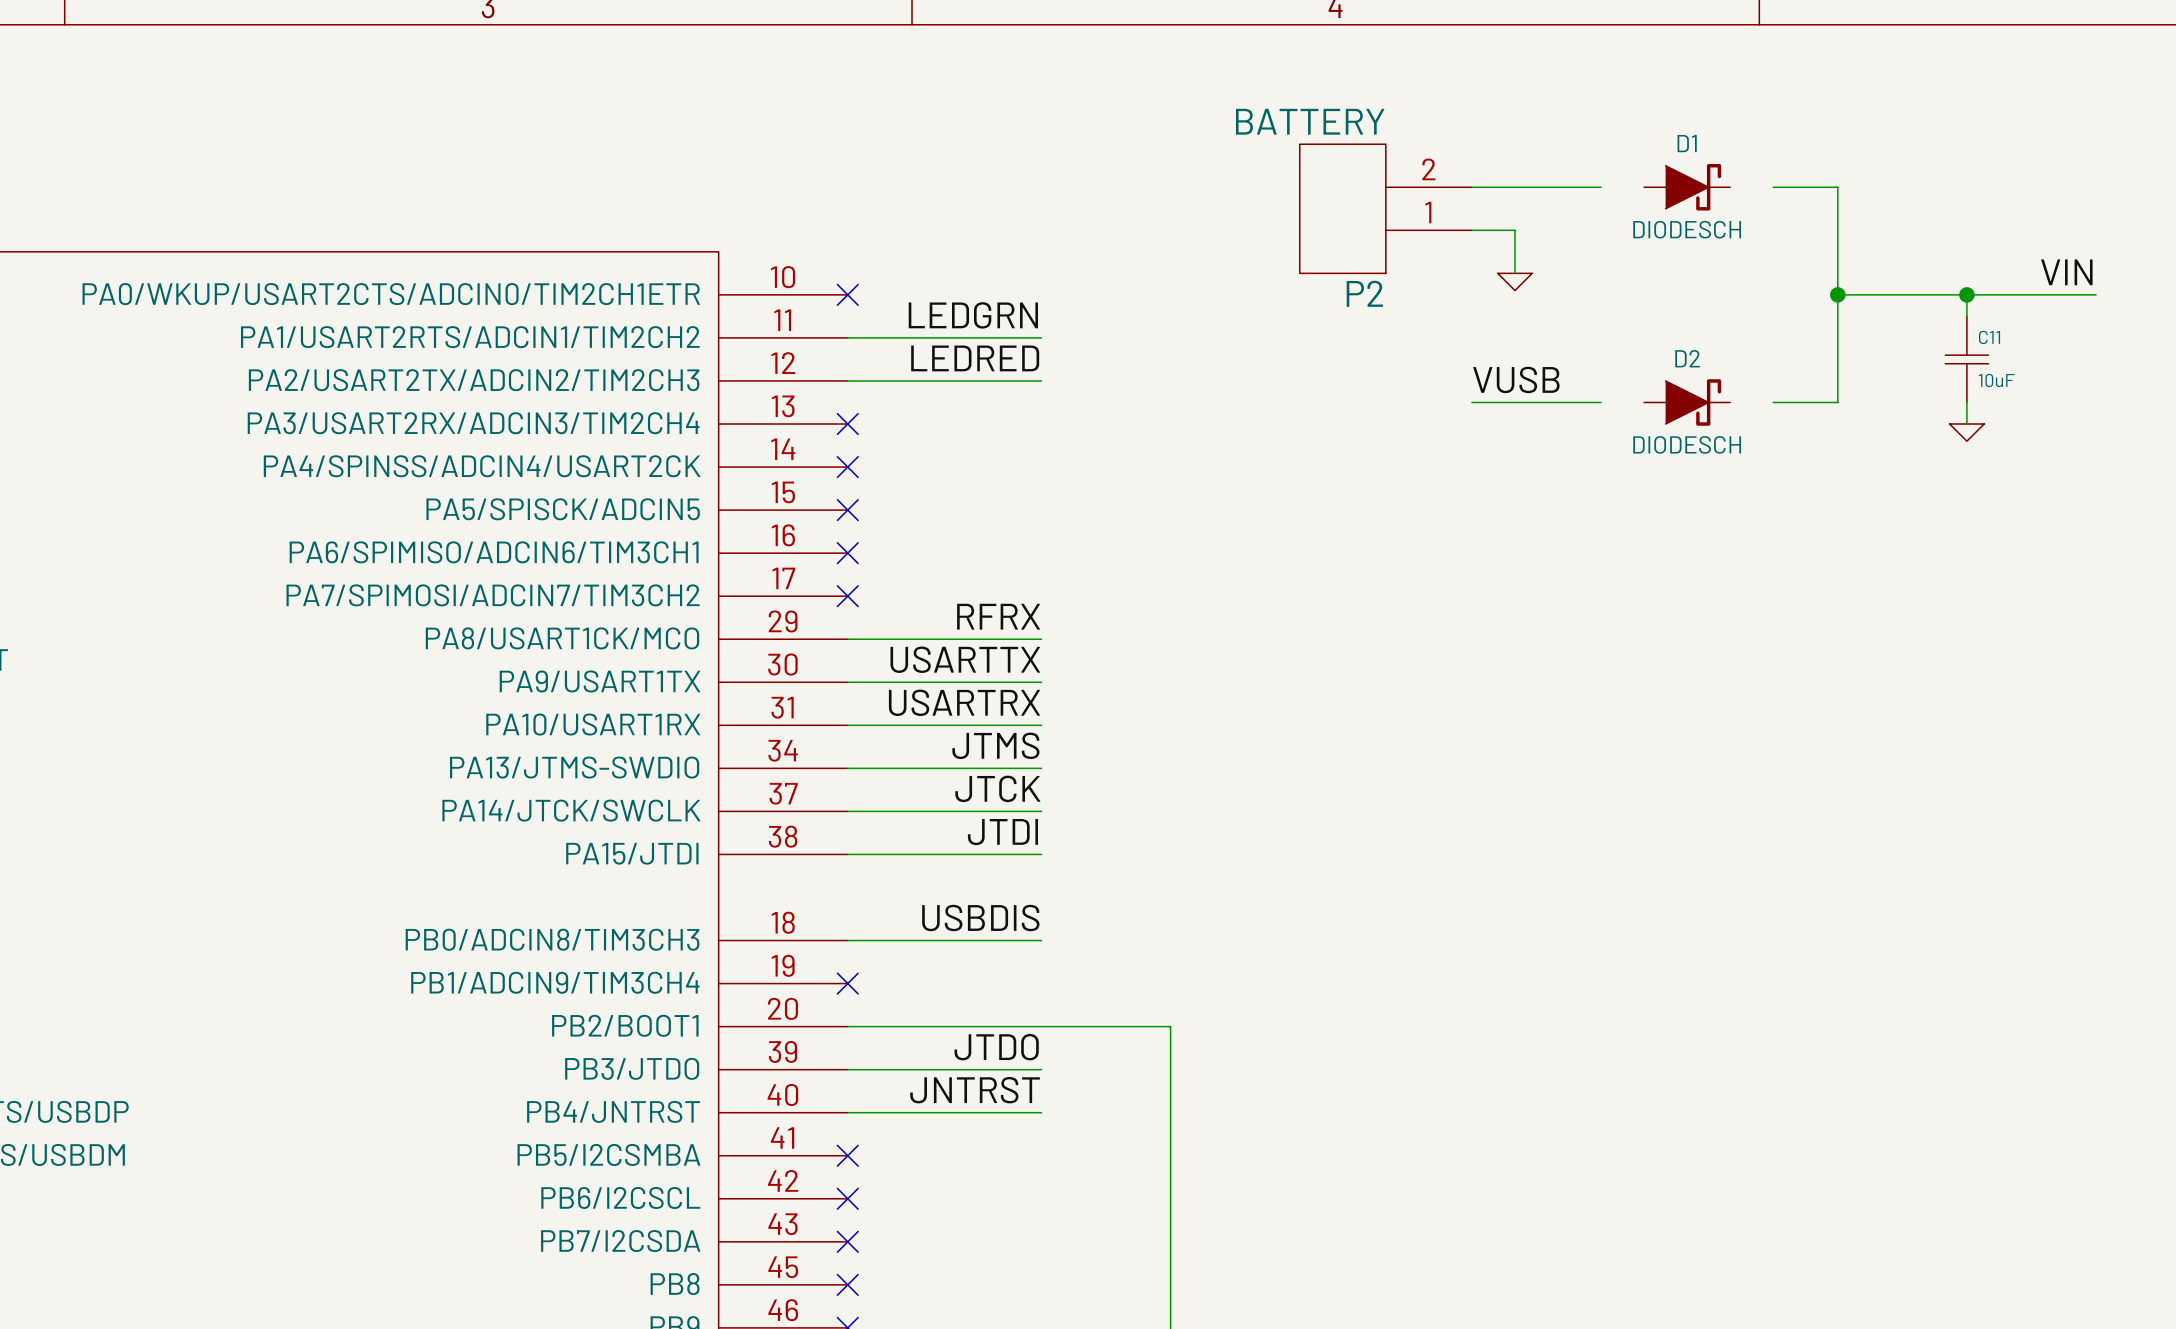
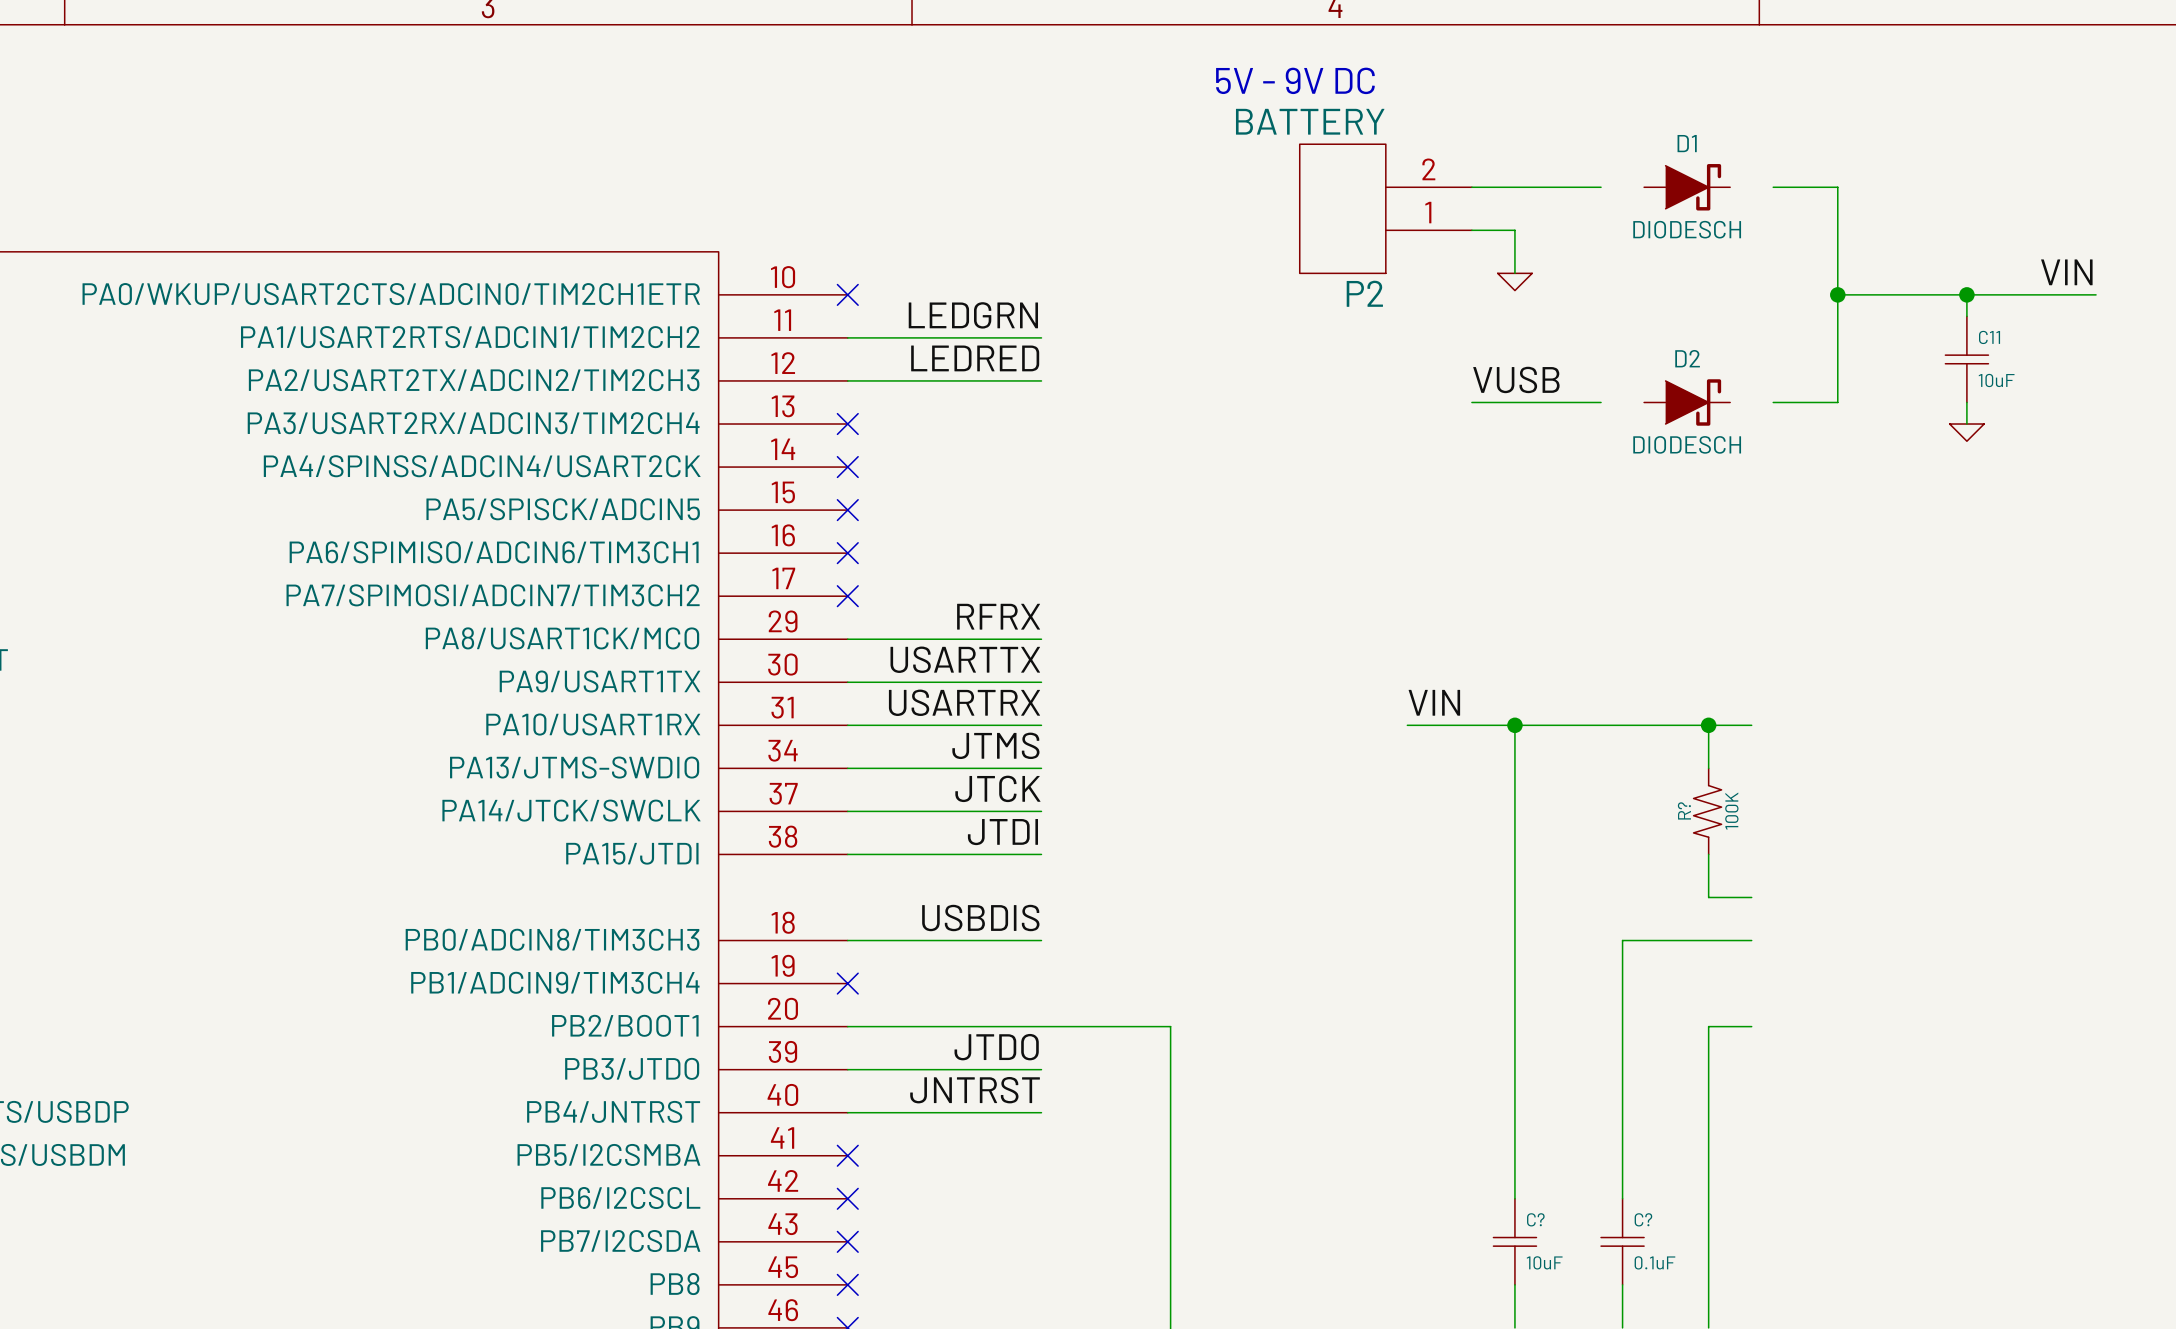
text: none -> 5V - 9V DC (1295, 80)
label: none -> VIN (1434, 702)
wire: none -> (1407, 725) (1751, 725)
wire: none -> (1514, 725) (1514, 1198)
junction: none -> (1514, 725)
wire: none -> (1708, 725) (1708, 768)
junction: none -> (1708, 725)
R?: none -> 100K (1707, 811)
wire: none -> (1708, 854) (1708, 897) (1751, 897)
wire: none -> (1751, 940) (1622, 940) (1622, 1198)
wire: none -> (1751, 1026) (1708, 1026) (1708, 1327)
C?: none -> 10uF (1514, 1241)
C?: none -> 0.1uF (1622, 1241)
wire: none -> (1514, 1284) (1514, 1327)
wire: none -> (1622, 1284) (1622, 1327)

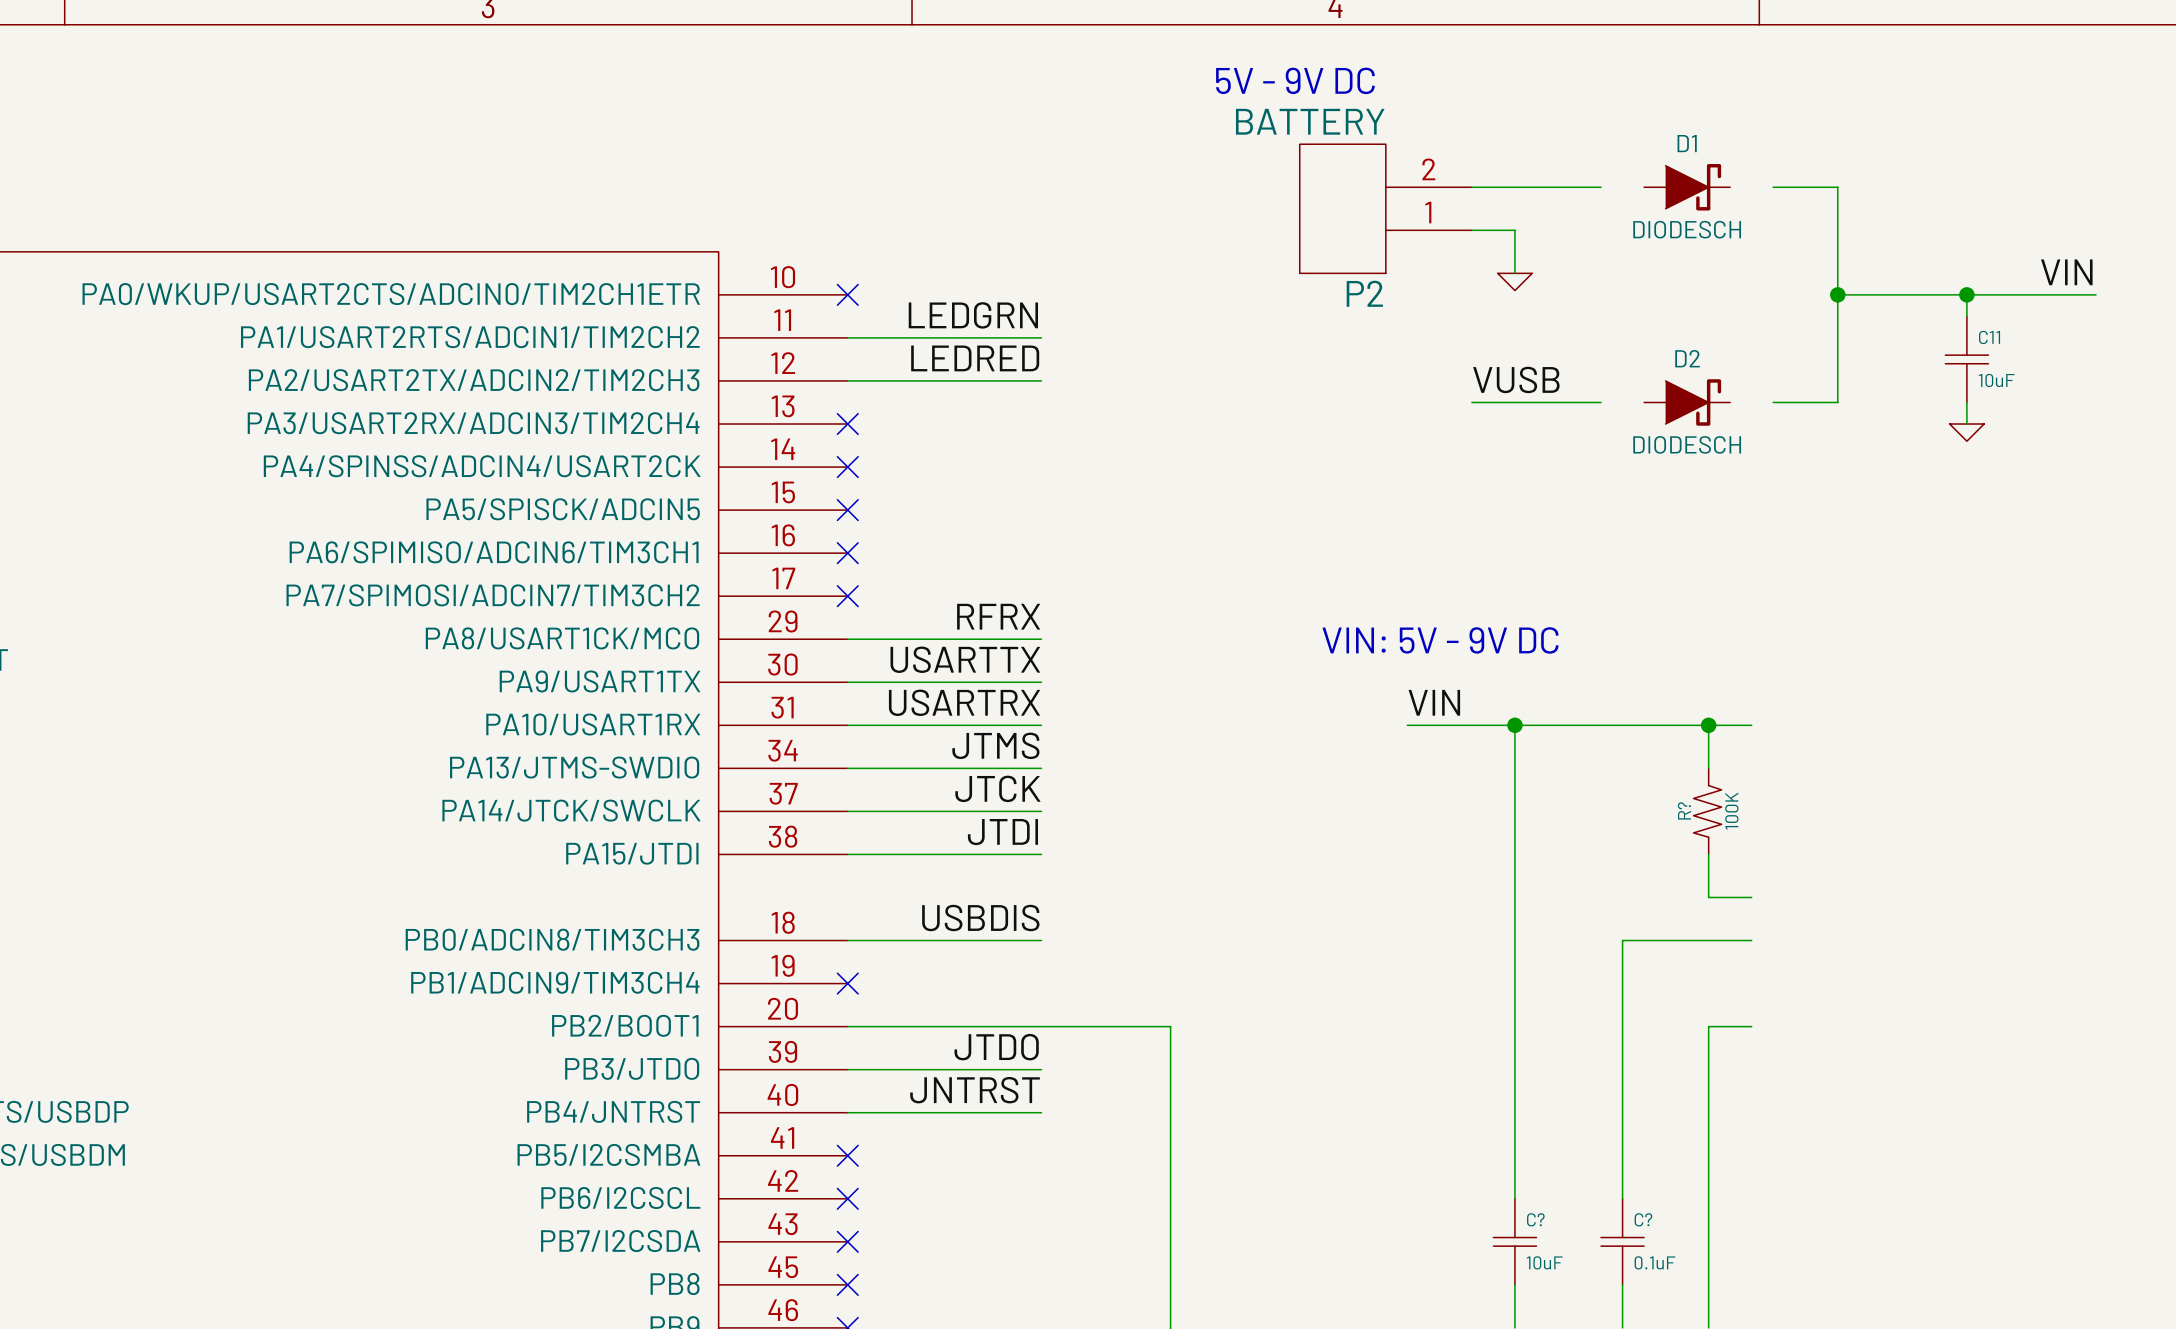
text: none -> VIN: 5V - 9V DC (1440, 640)

